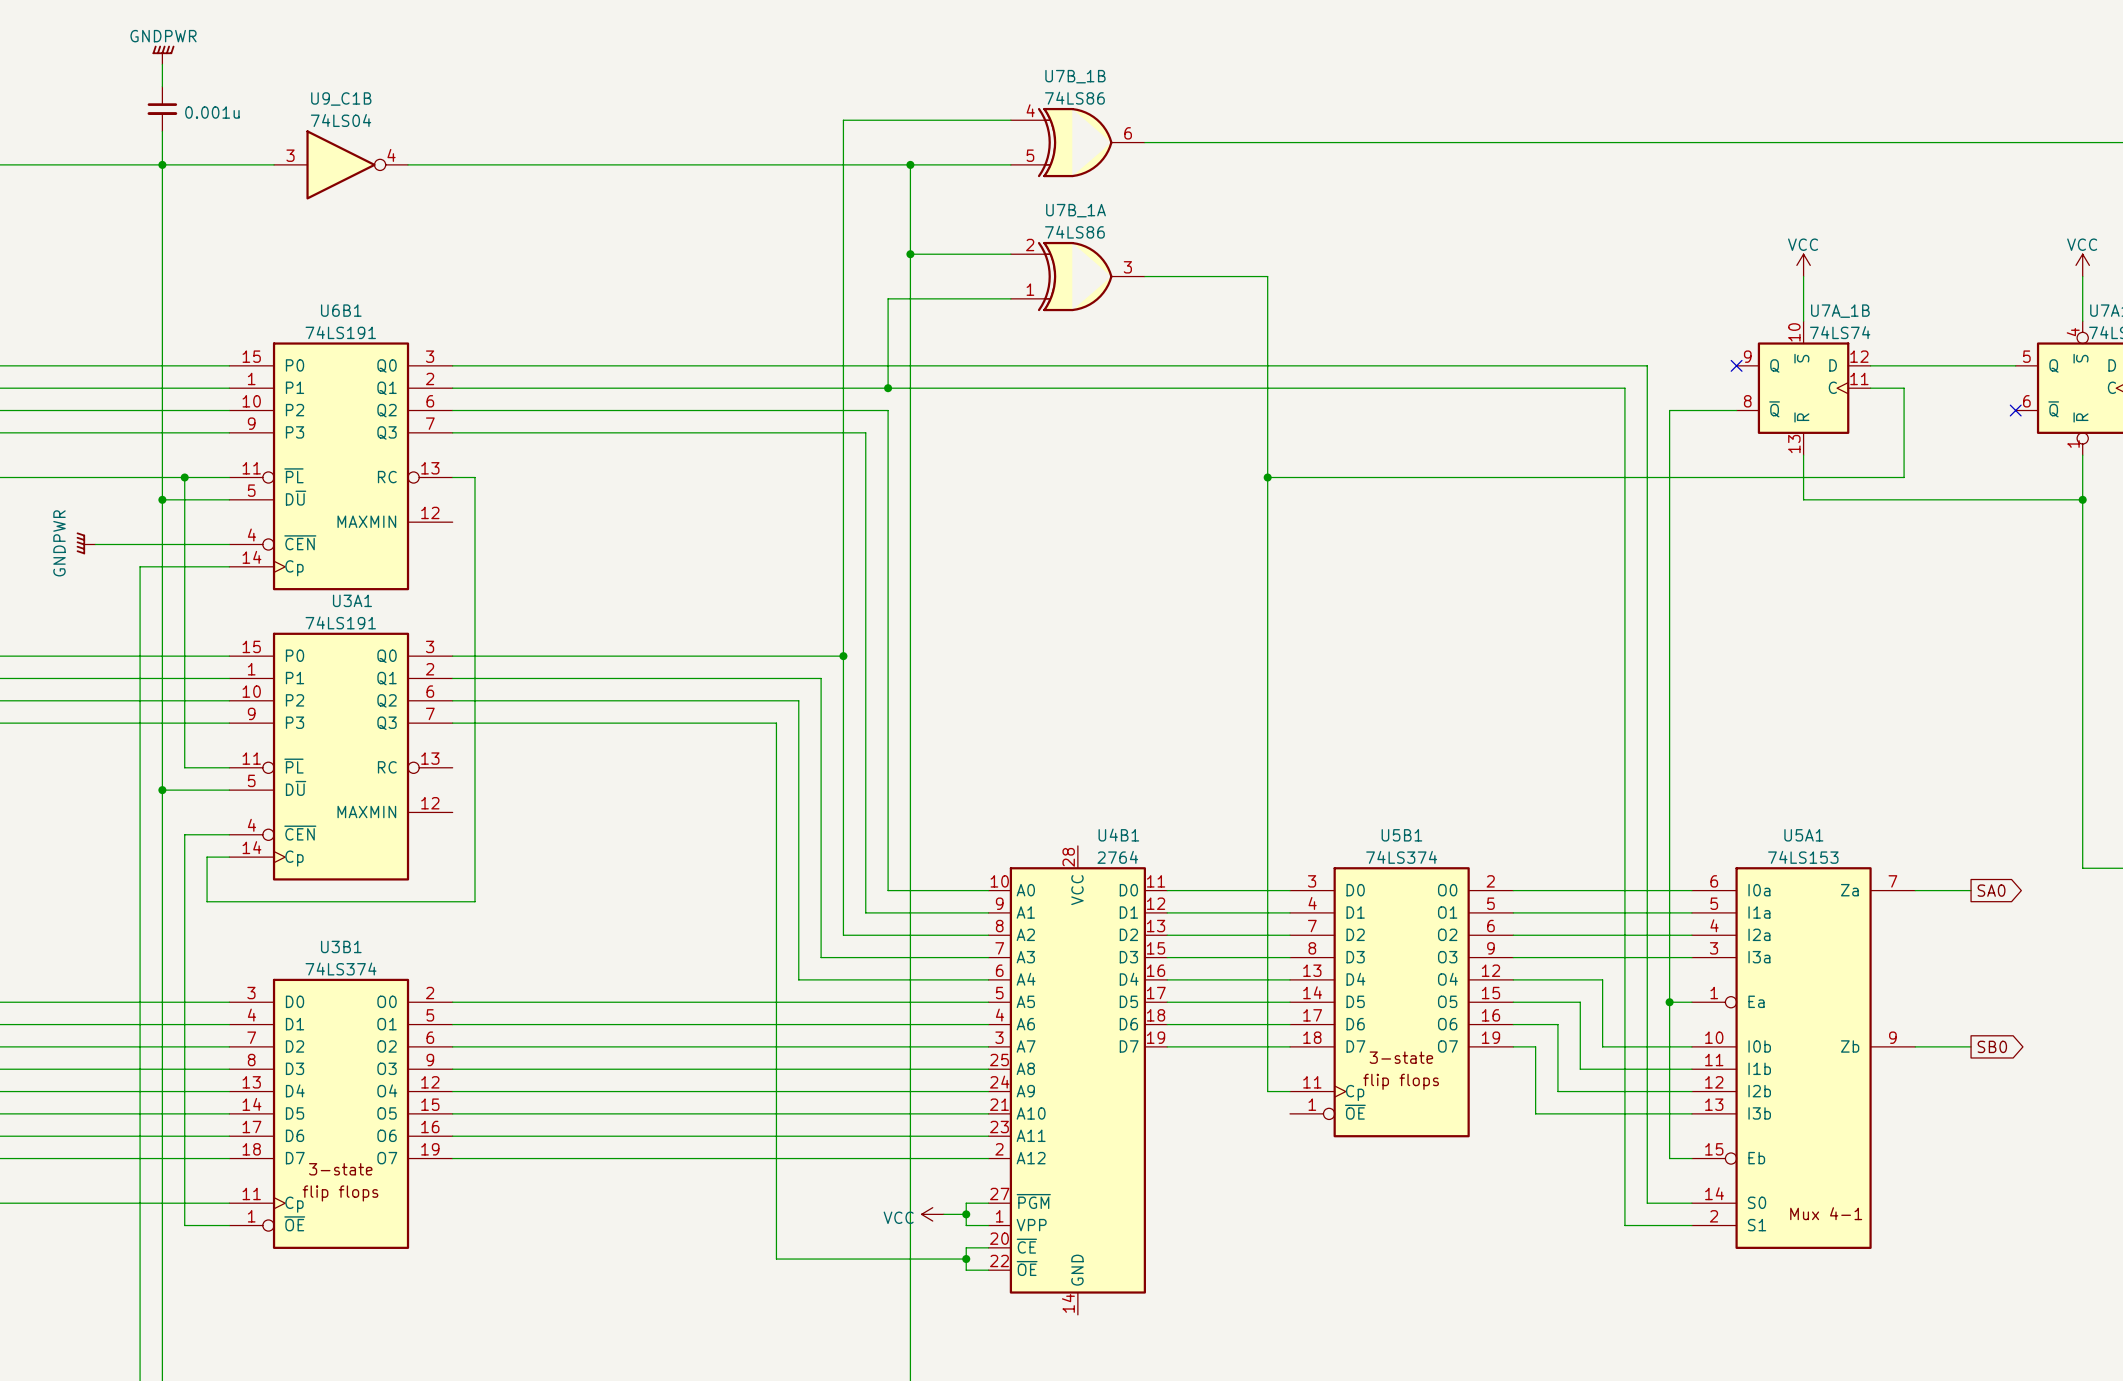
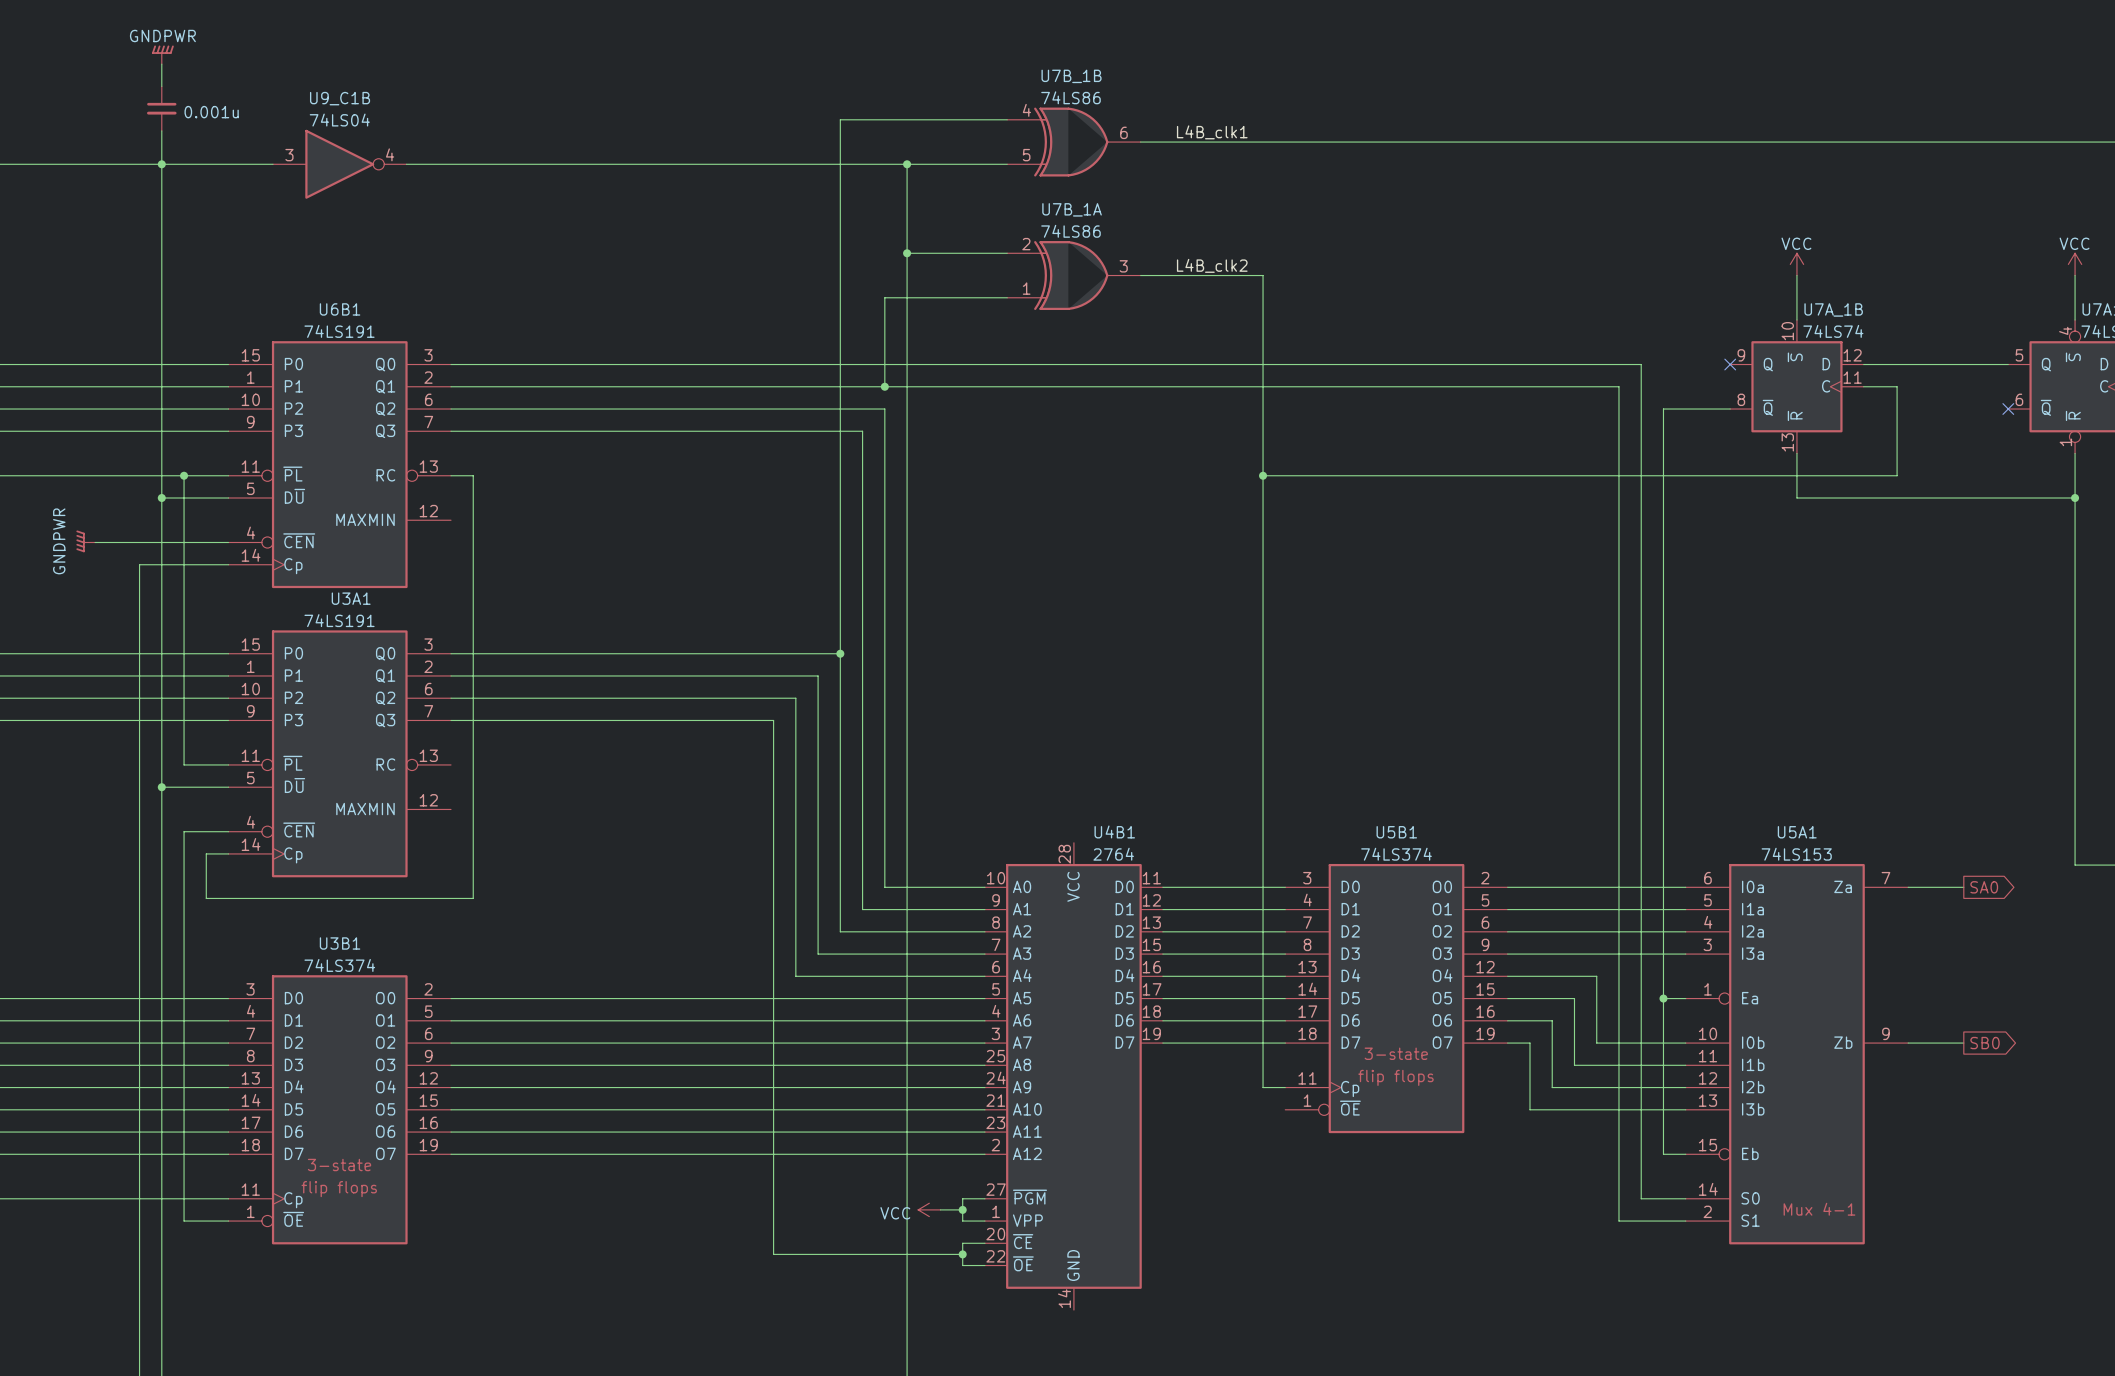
label: none -> L4B_clk1 (1212, 132)
label: none -> L4B_clk2 (1212, 265)

